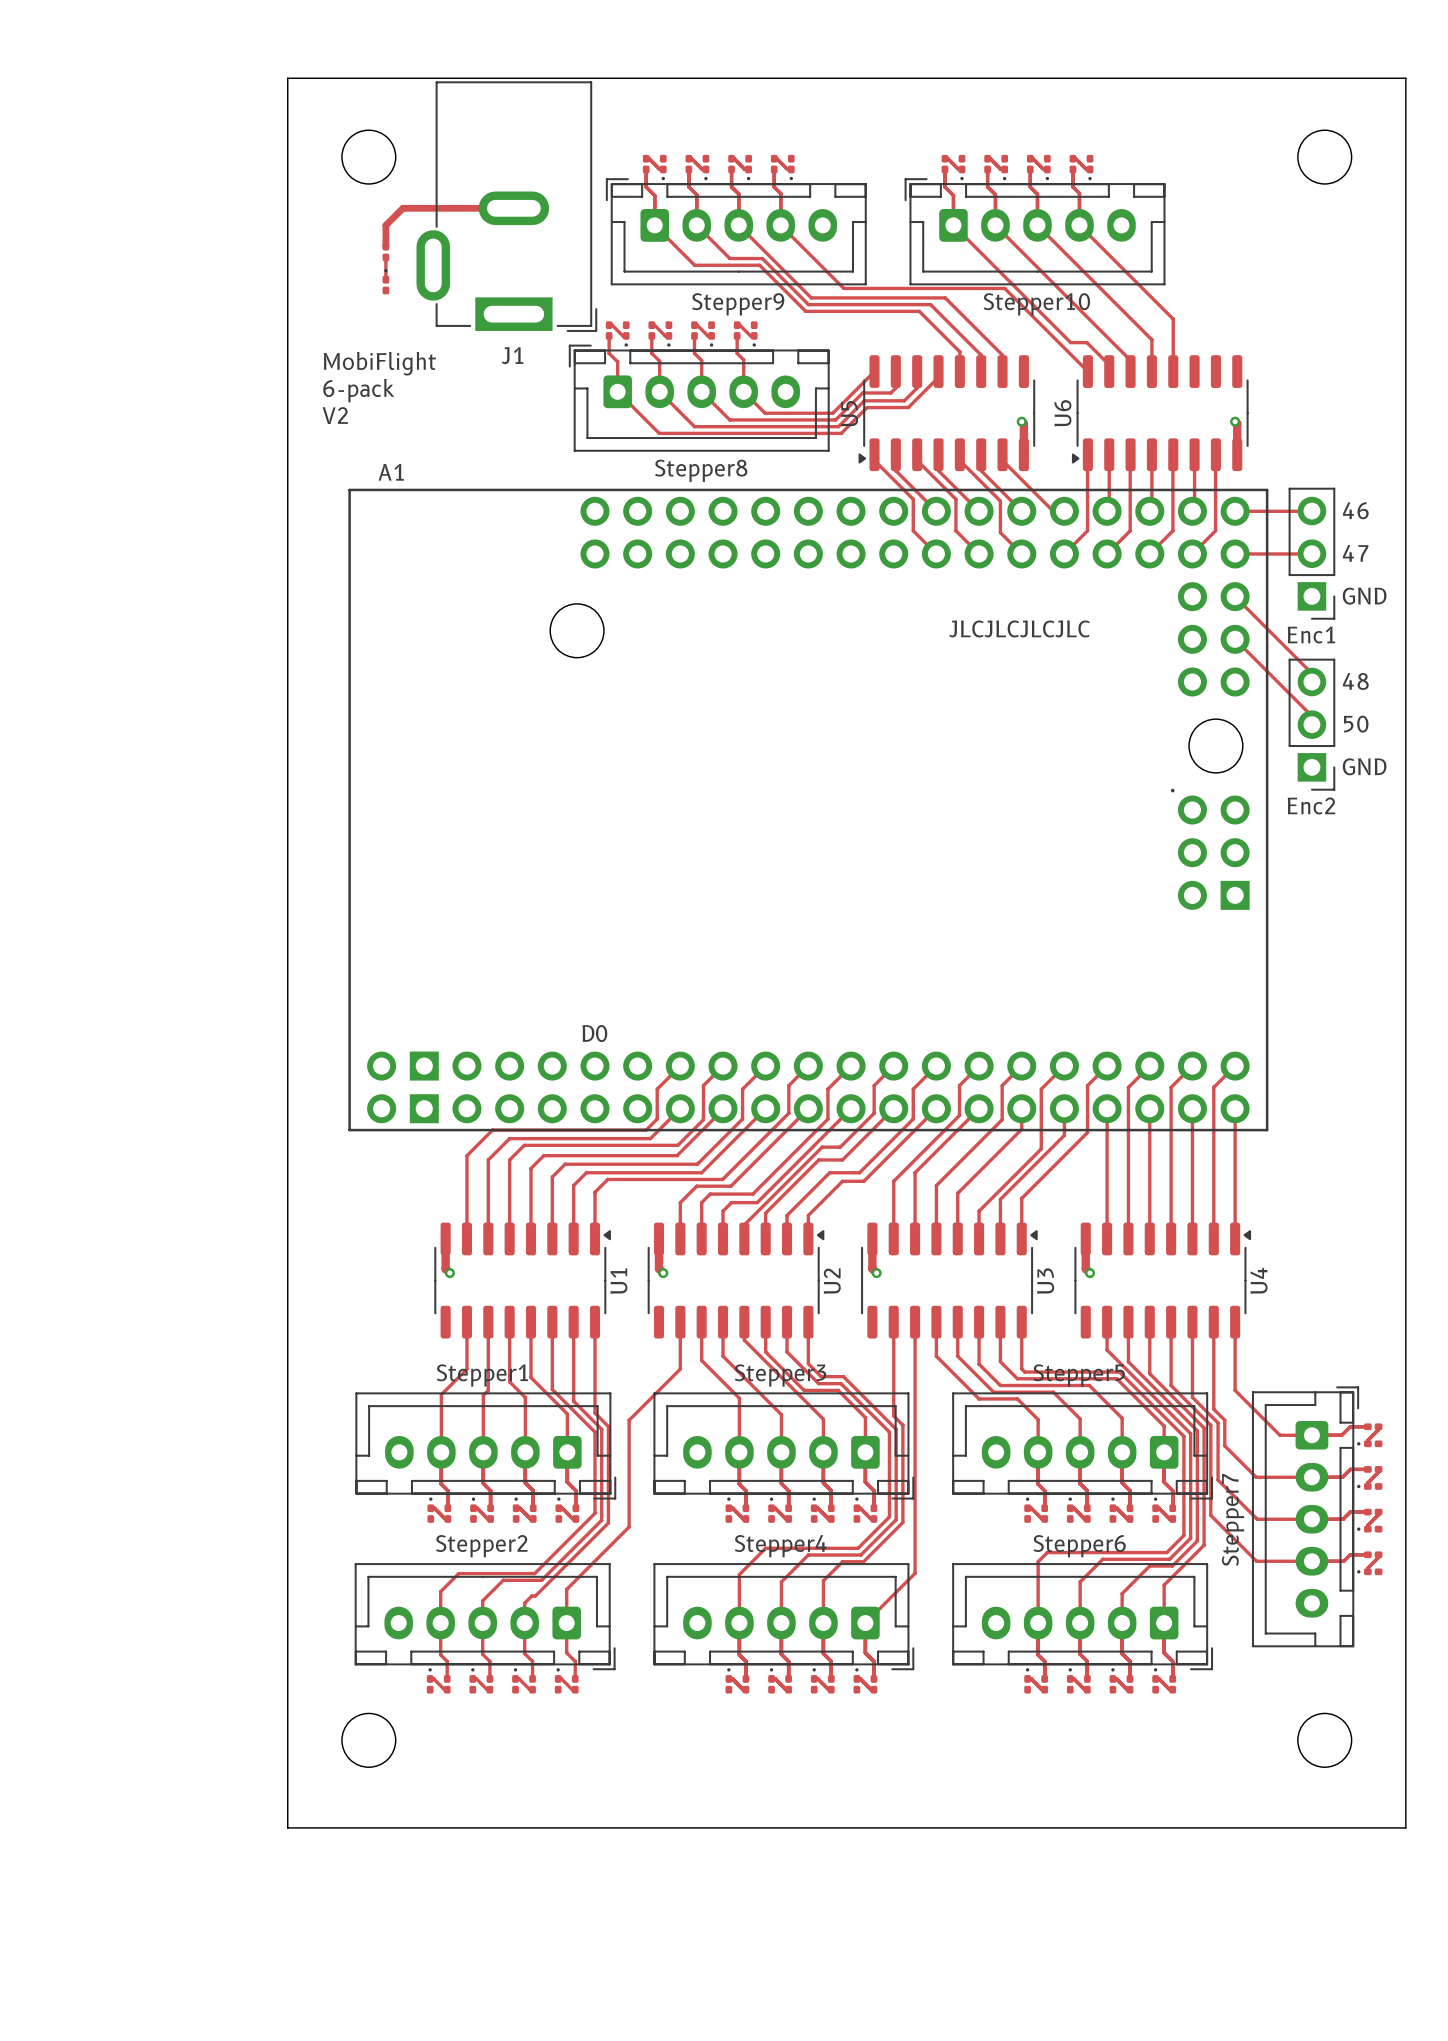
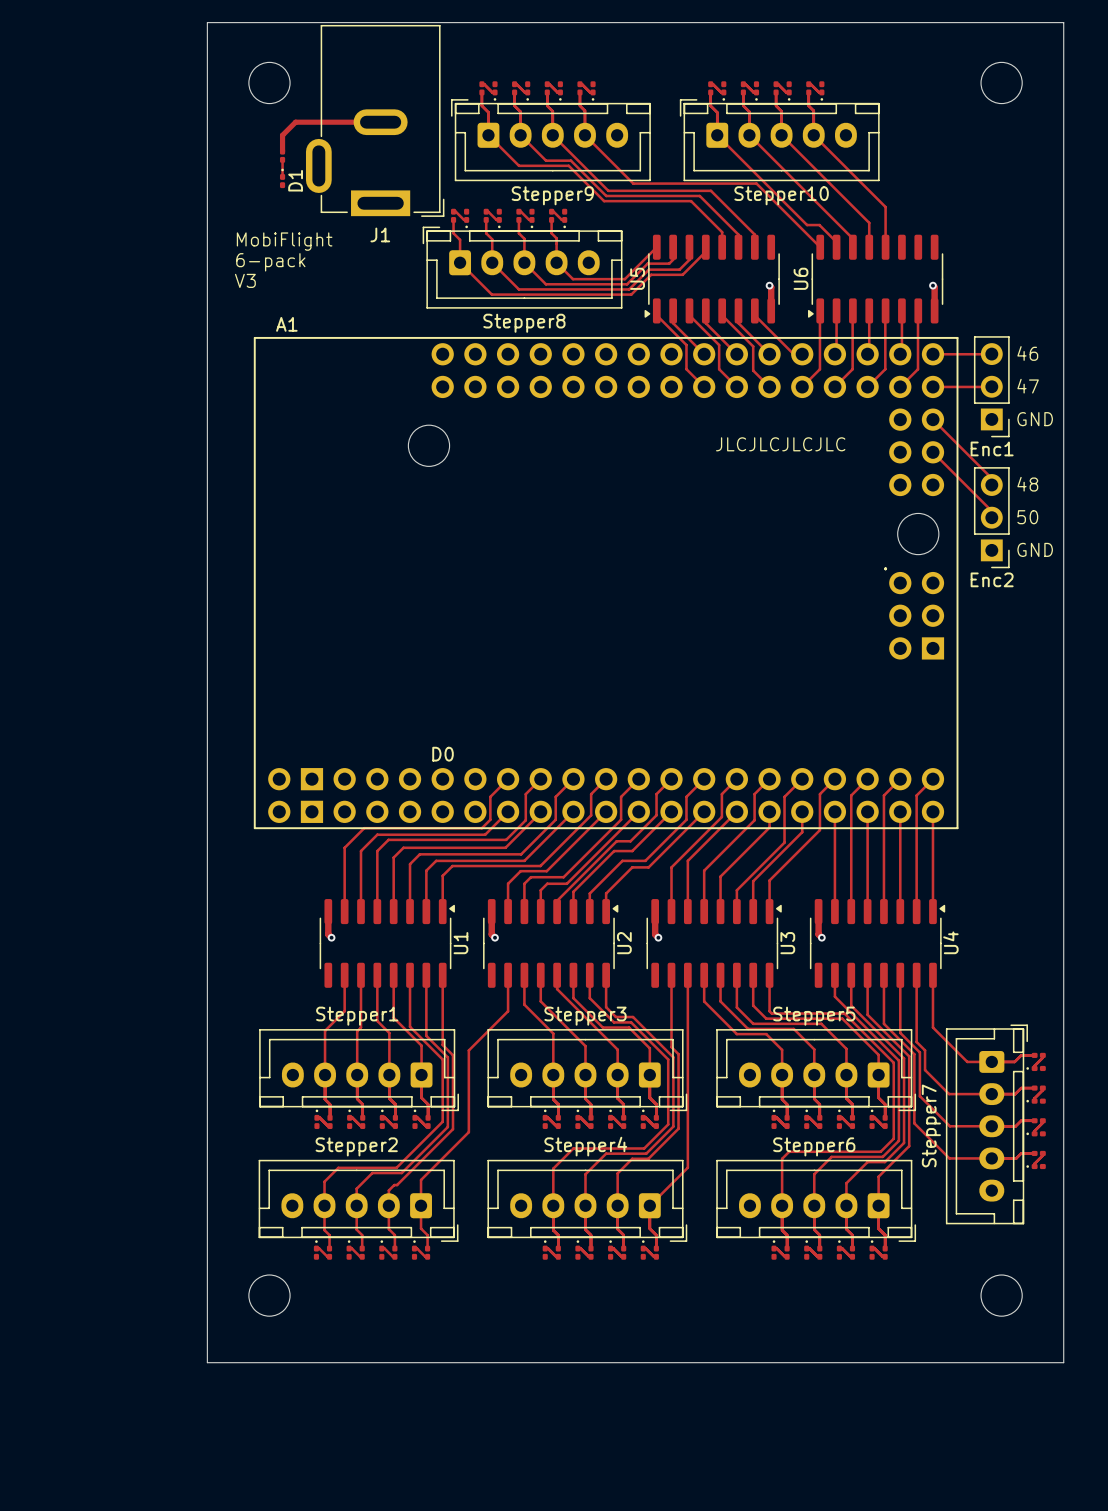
D1 name: none -> D1 (295, 180)
text: V2 (335, 415) -> V3 (245, 280)

